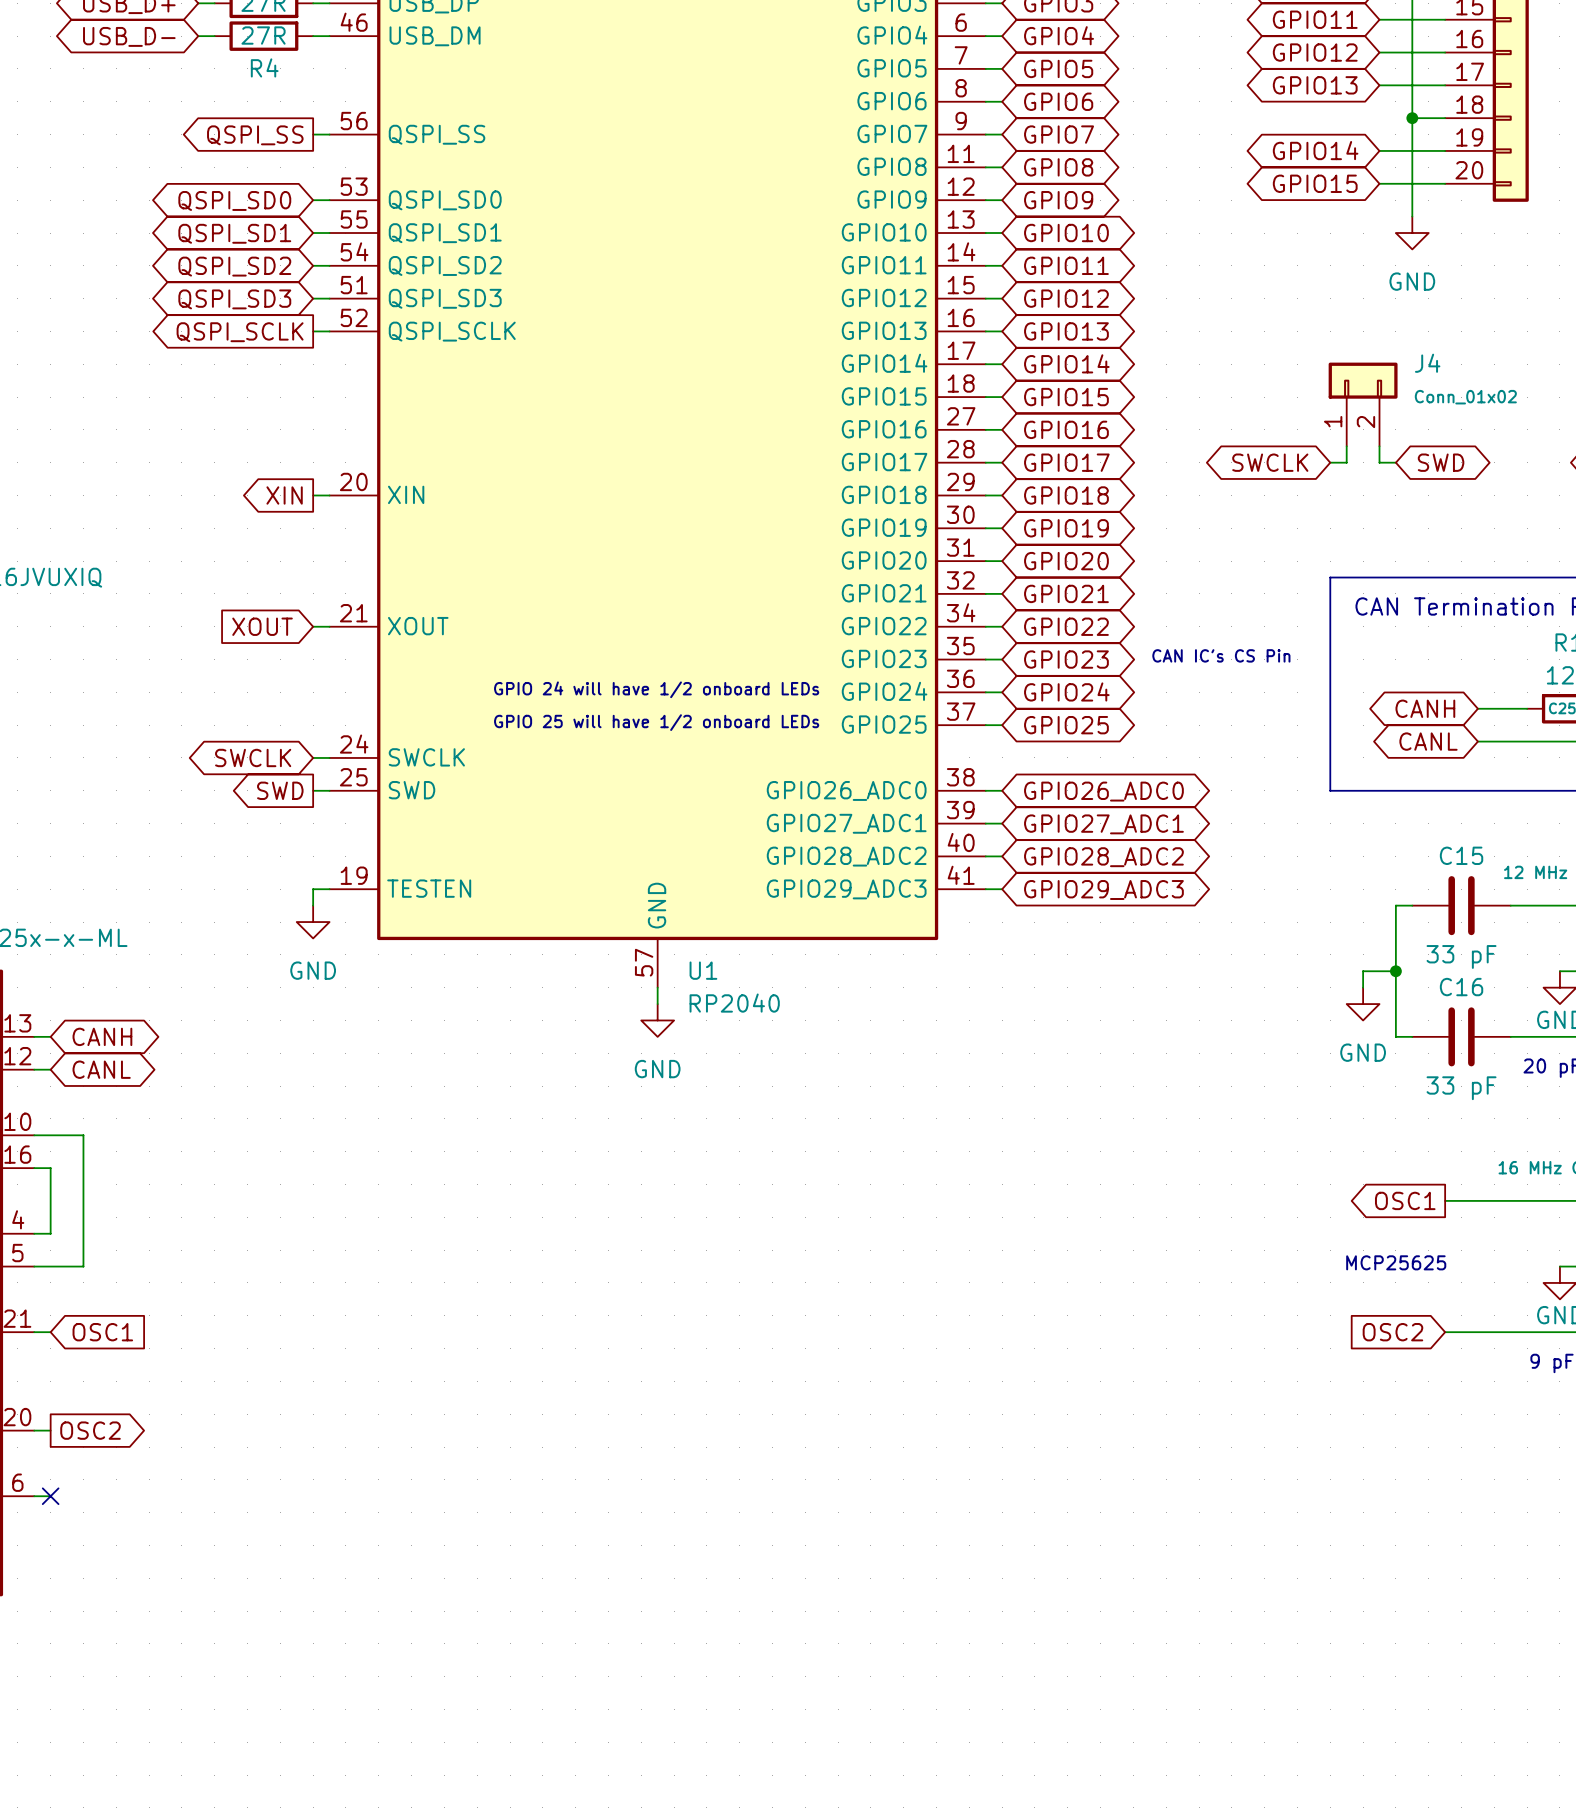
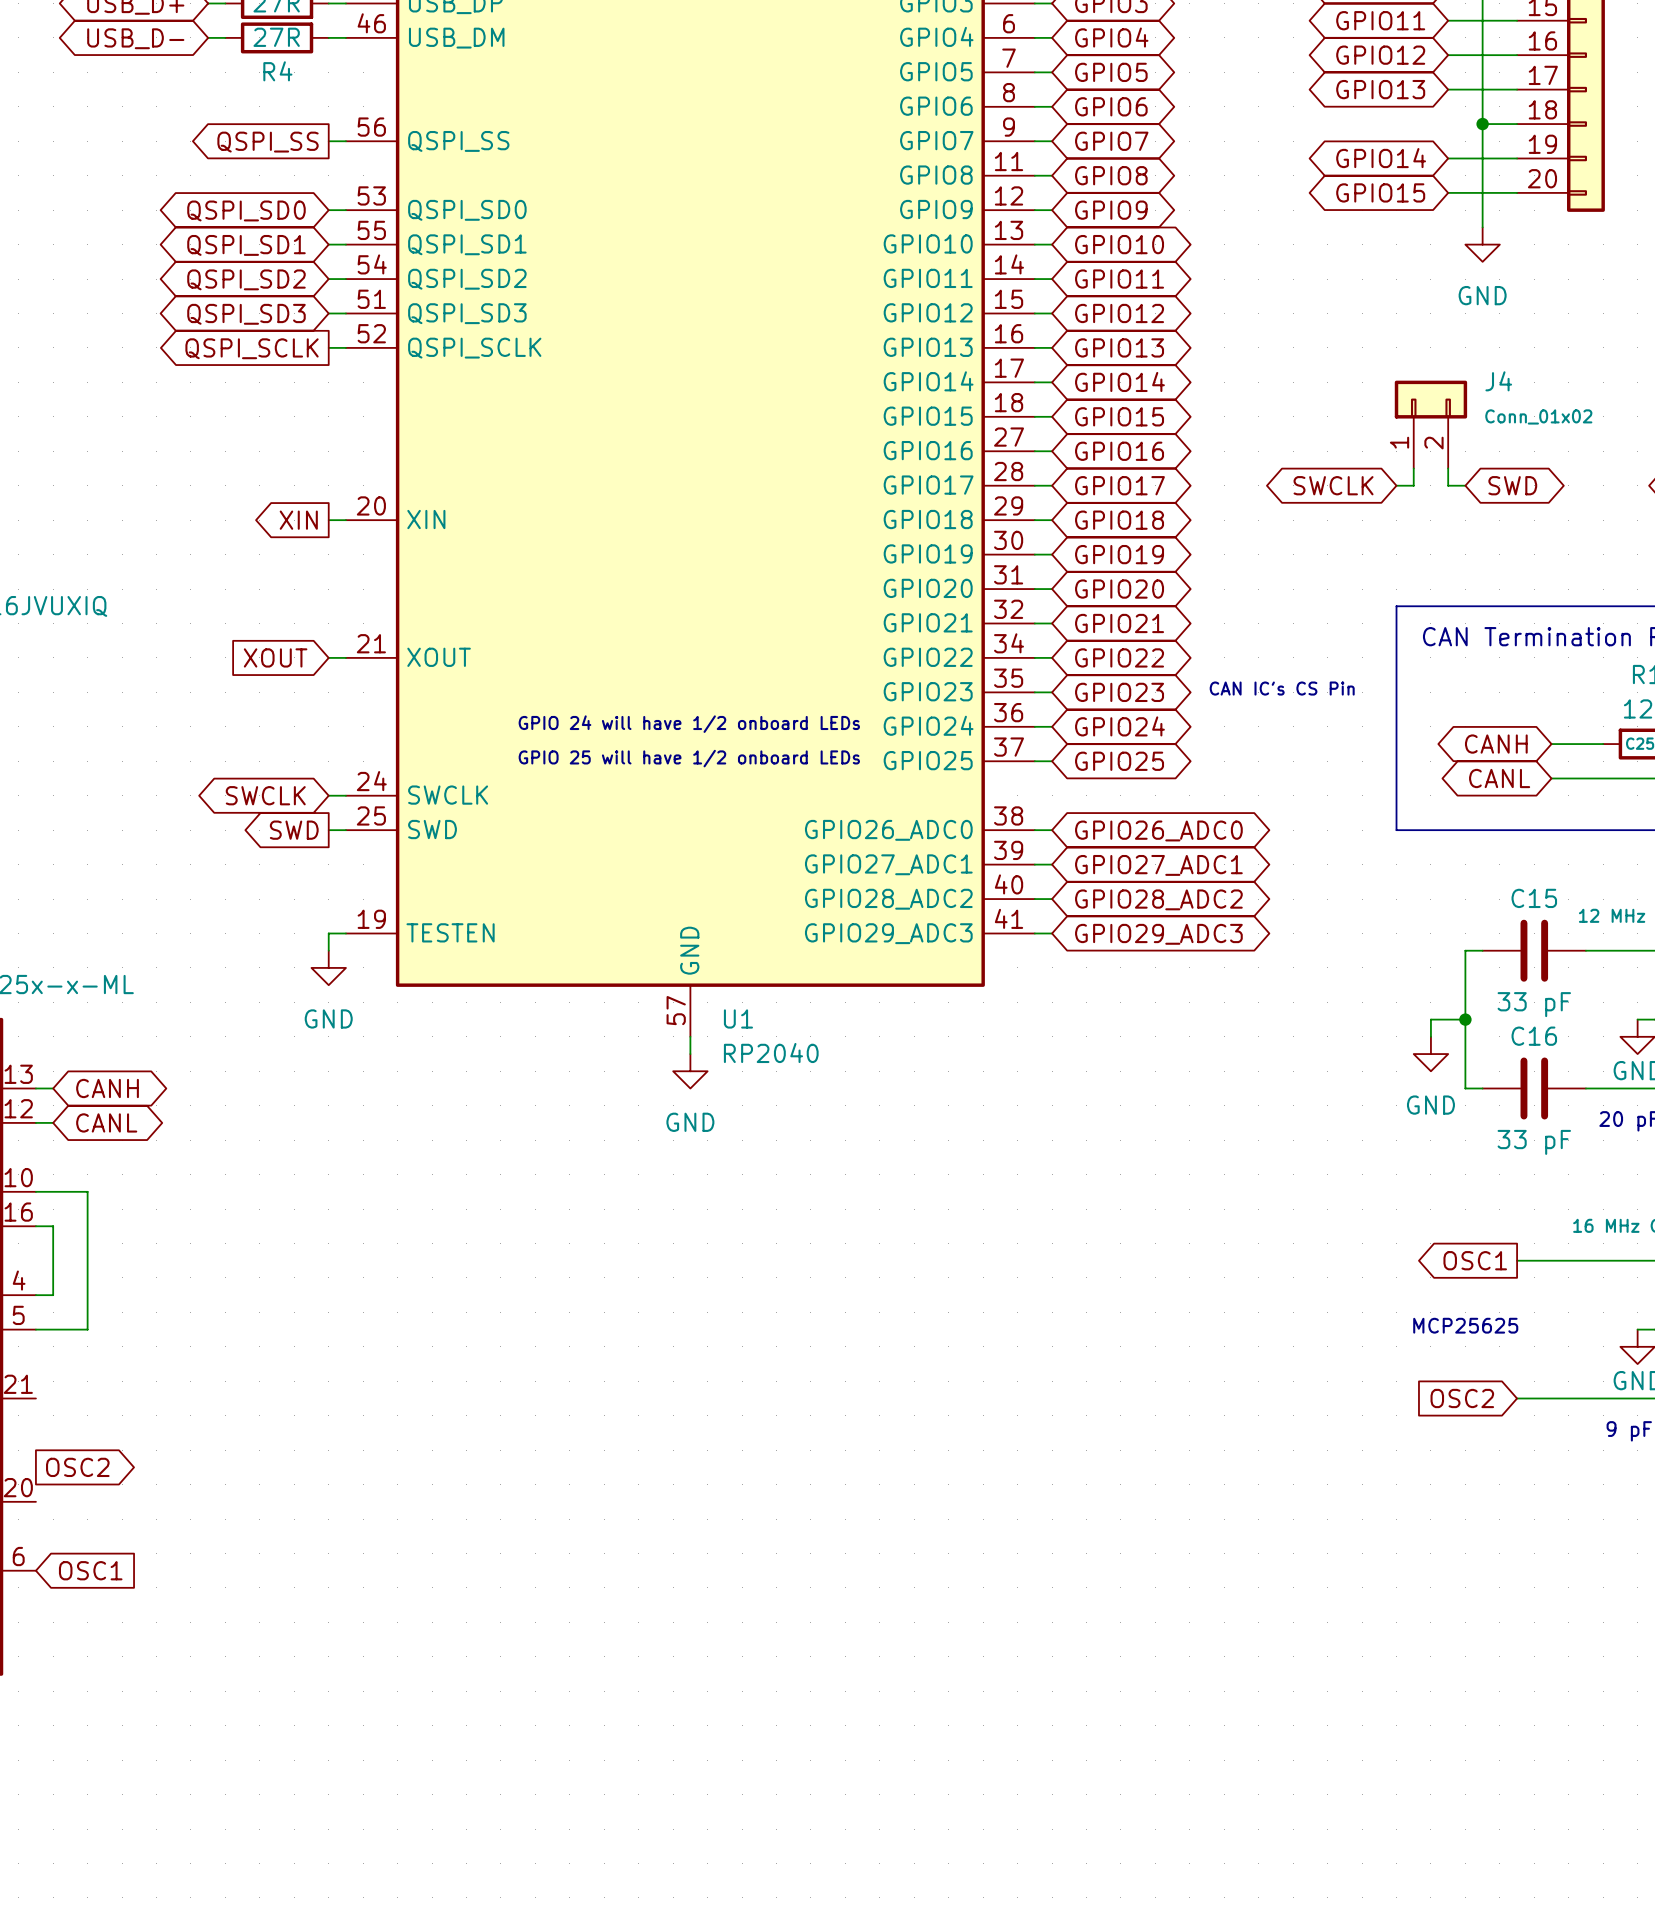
wire: (34, 1332) (50, 1332) -> none
global label position: OSC1 (102, 1332) -> OSC1 (90, 1570)
wire: (34, 1430) (50, 1430) -> none
global label position: OSC2 (90, 1430) -> OSC2 (77, 1467)
wire: (34, 1496) (50, 1496) -> none
no-connect mark: (50, 1496) -> none

